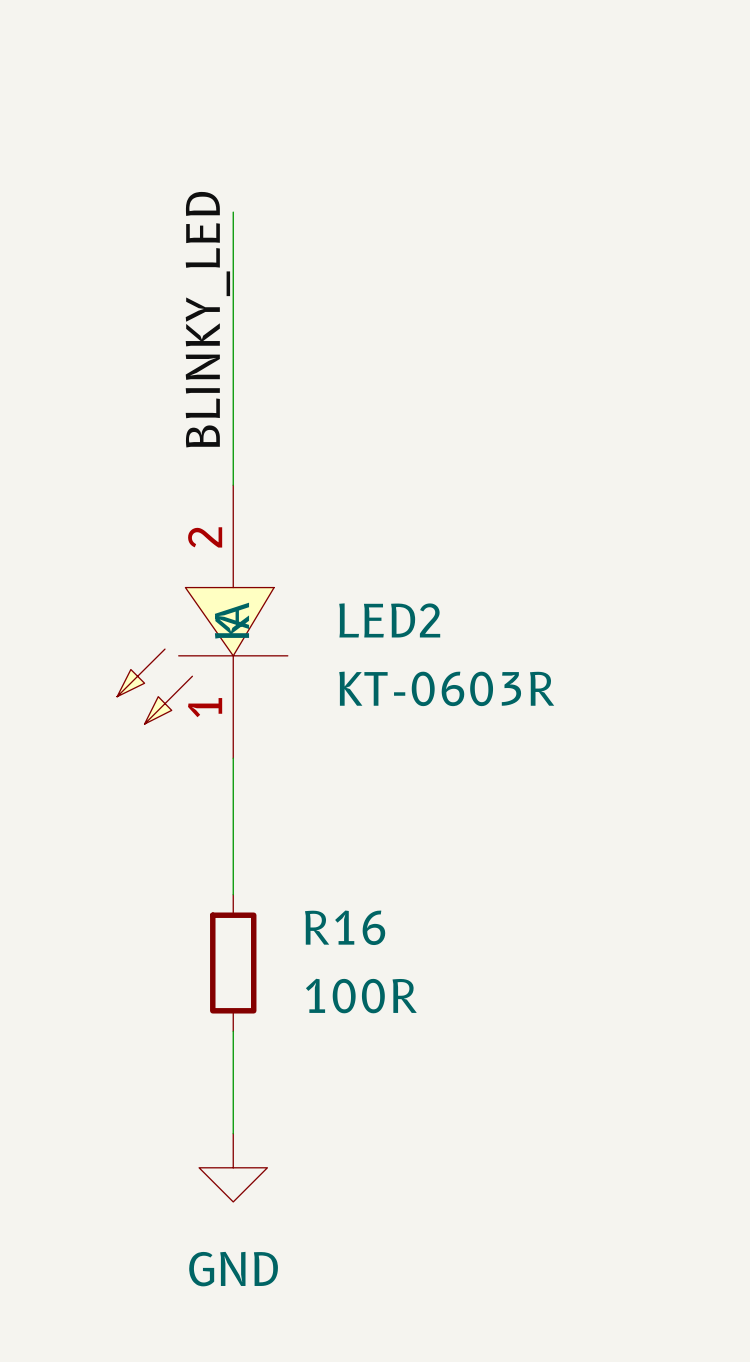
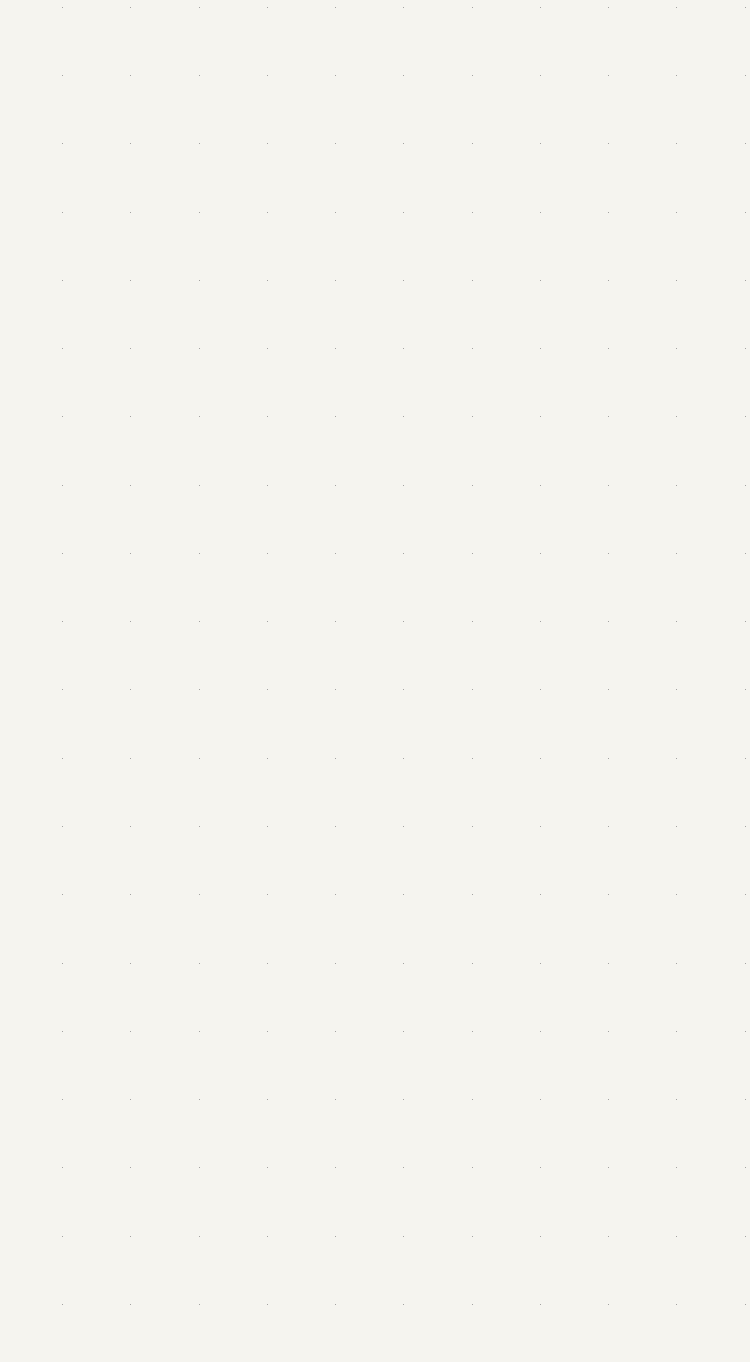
wire: (233, 212) (233, 485) -> none
label: BLINKY_LED (207, 319) -> none
LED2: KT-0603R (202, 621) -> none
wire: (233, 758) (233, 894) -> none
R16: 100R (233, 963) -> none
wire: (233, 1031) (233, 1133) -> none
power symbol: GND (233, 1167) -> none

